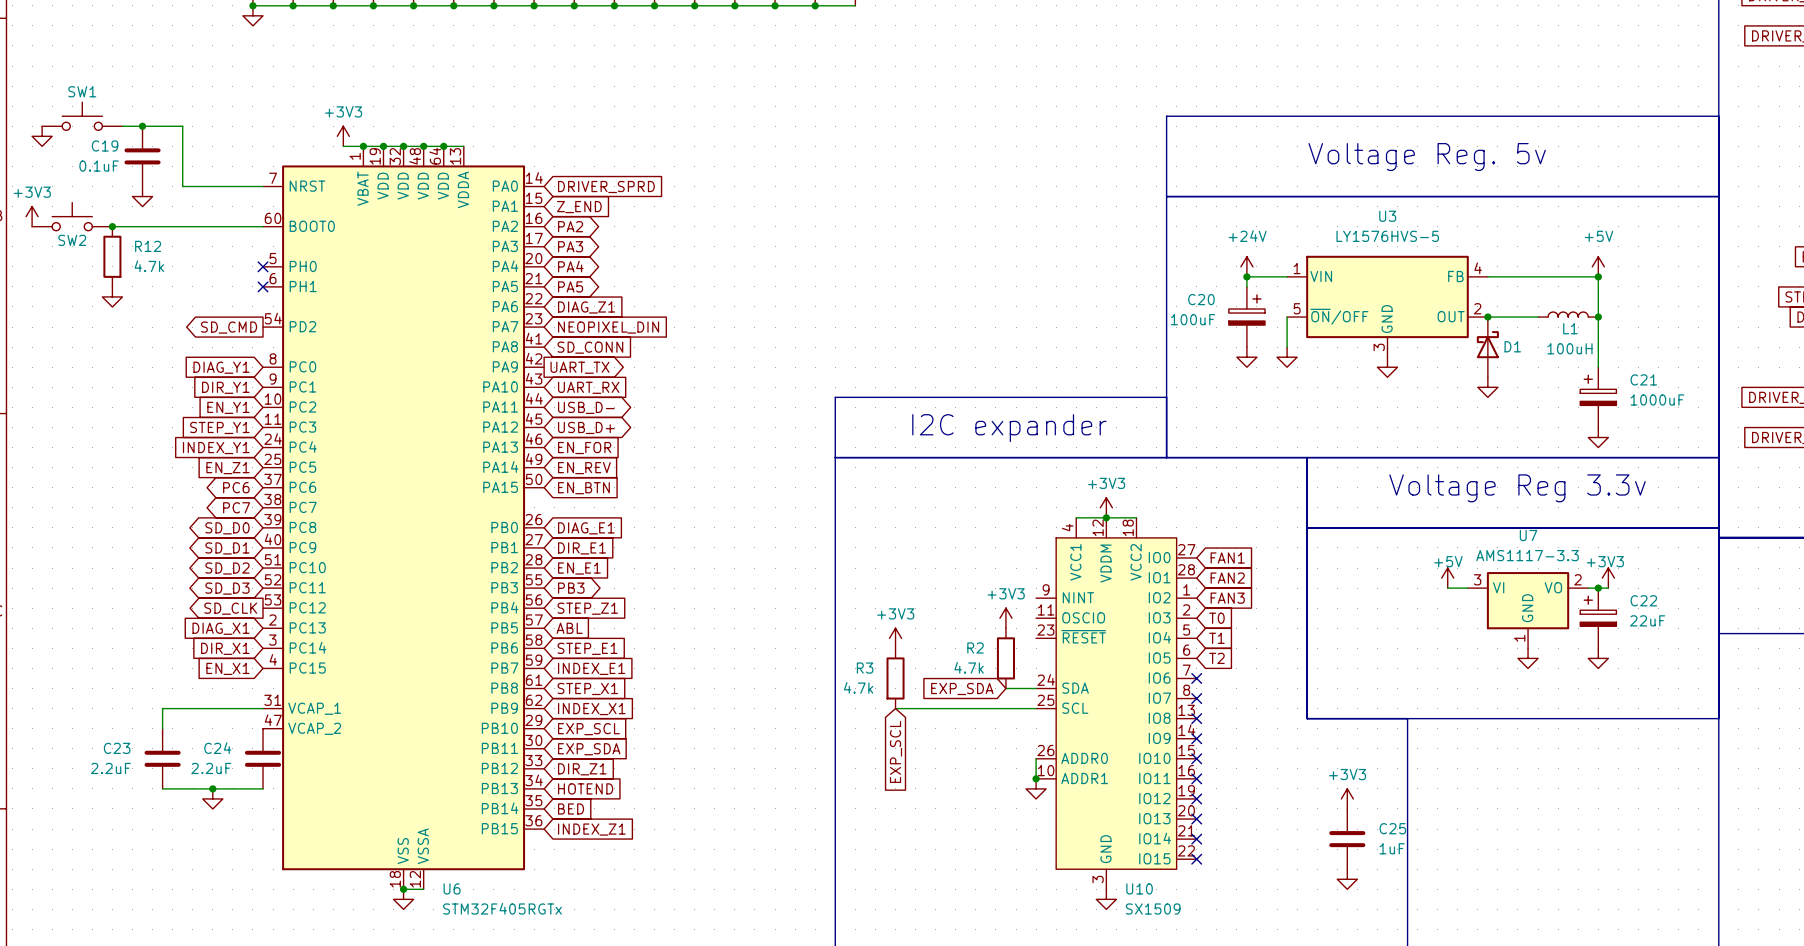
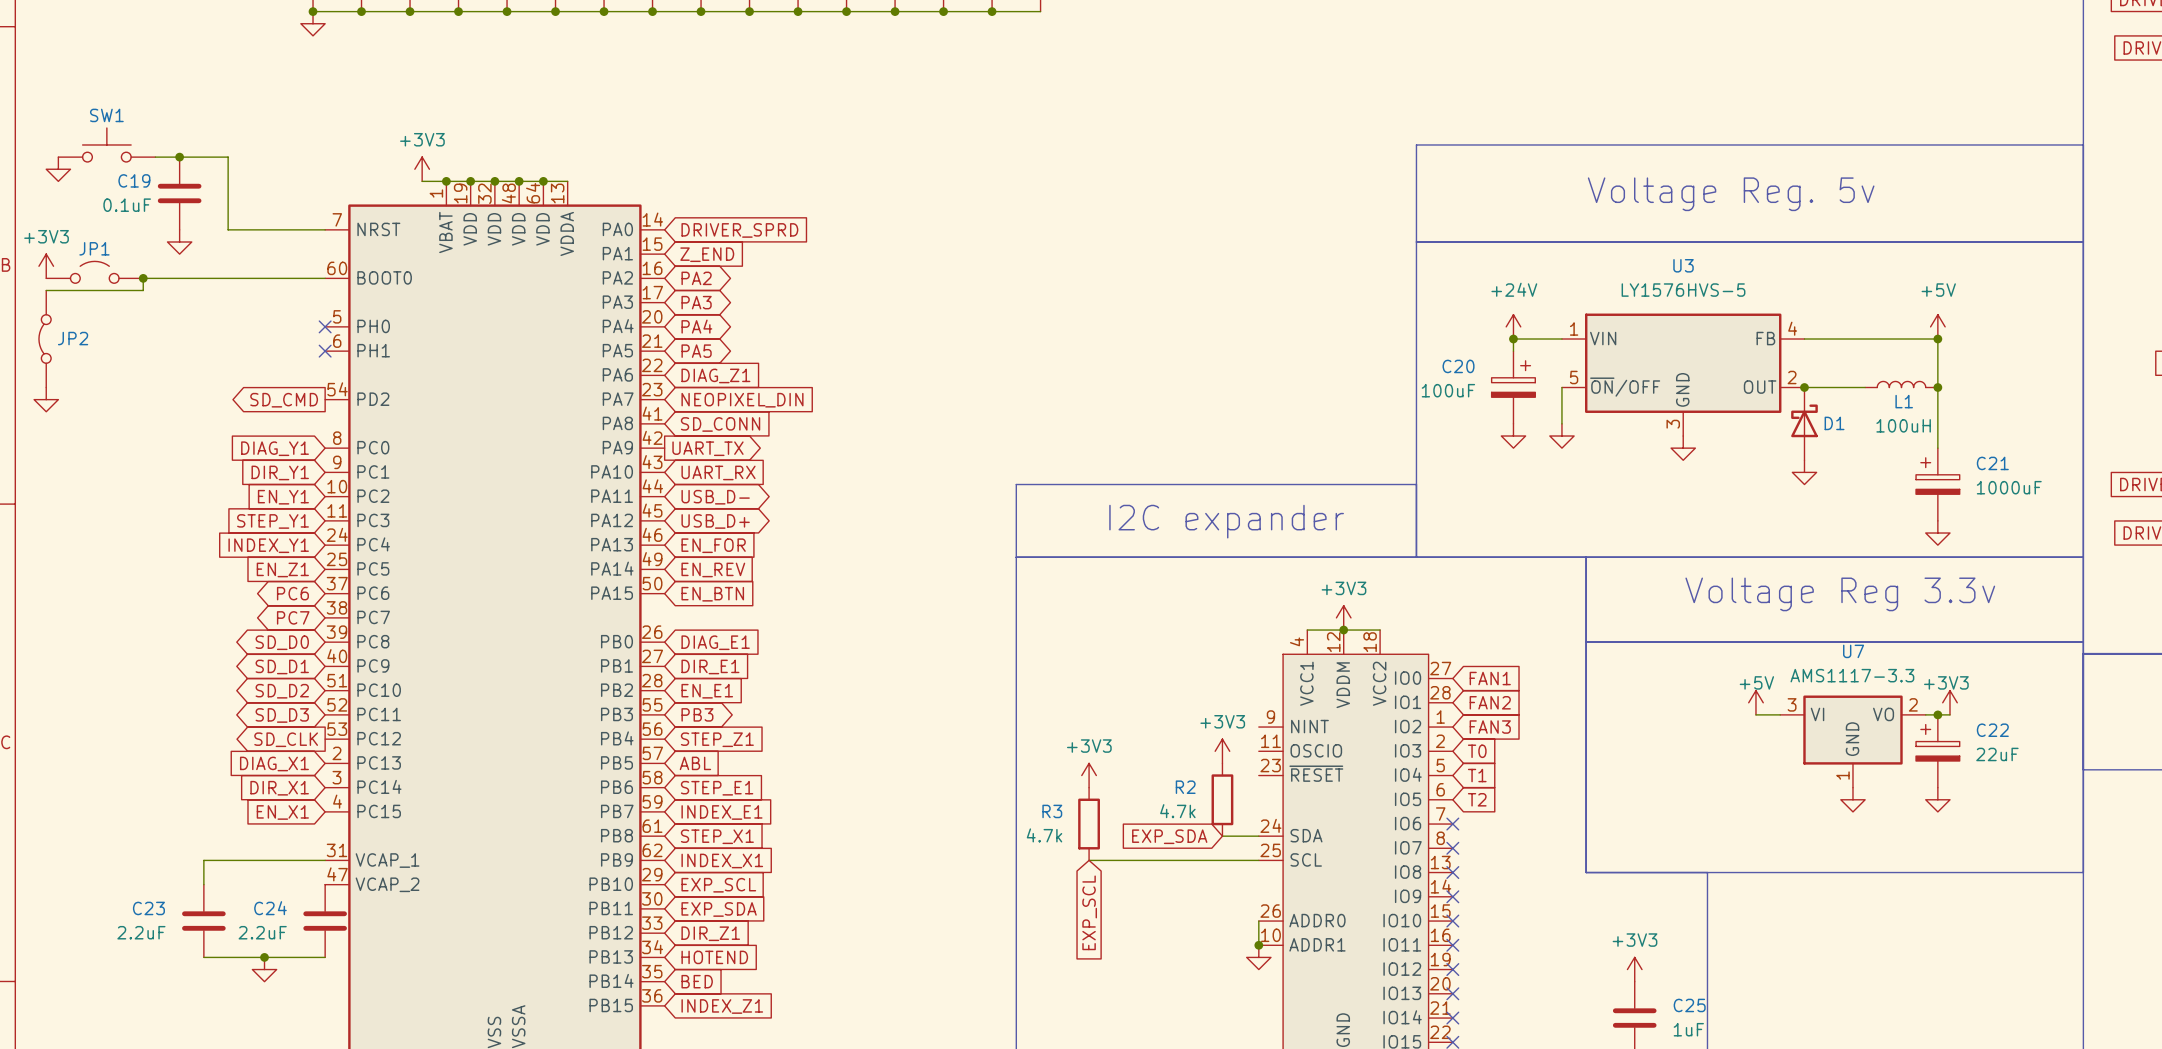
SW2: (72, 216) -> none
JP1: none -> (94, 272)
wire: none -> (143, 278) (143, 290) (46, 290)
R12: 4.7k (112, 256) -> none
JP2: none -> (45, 339)
power symbol position: (112, 296) -> (46, 399)

